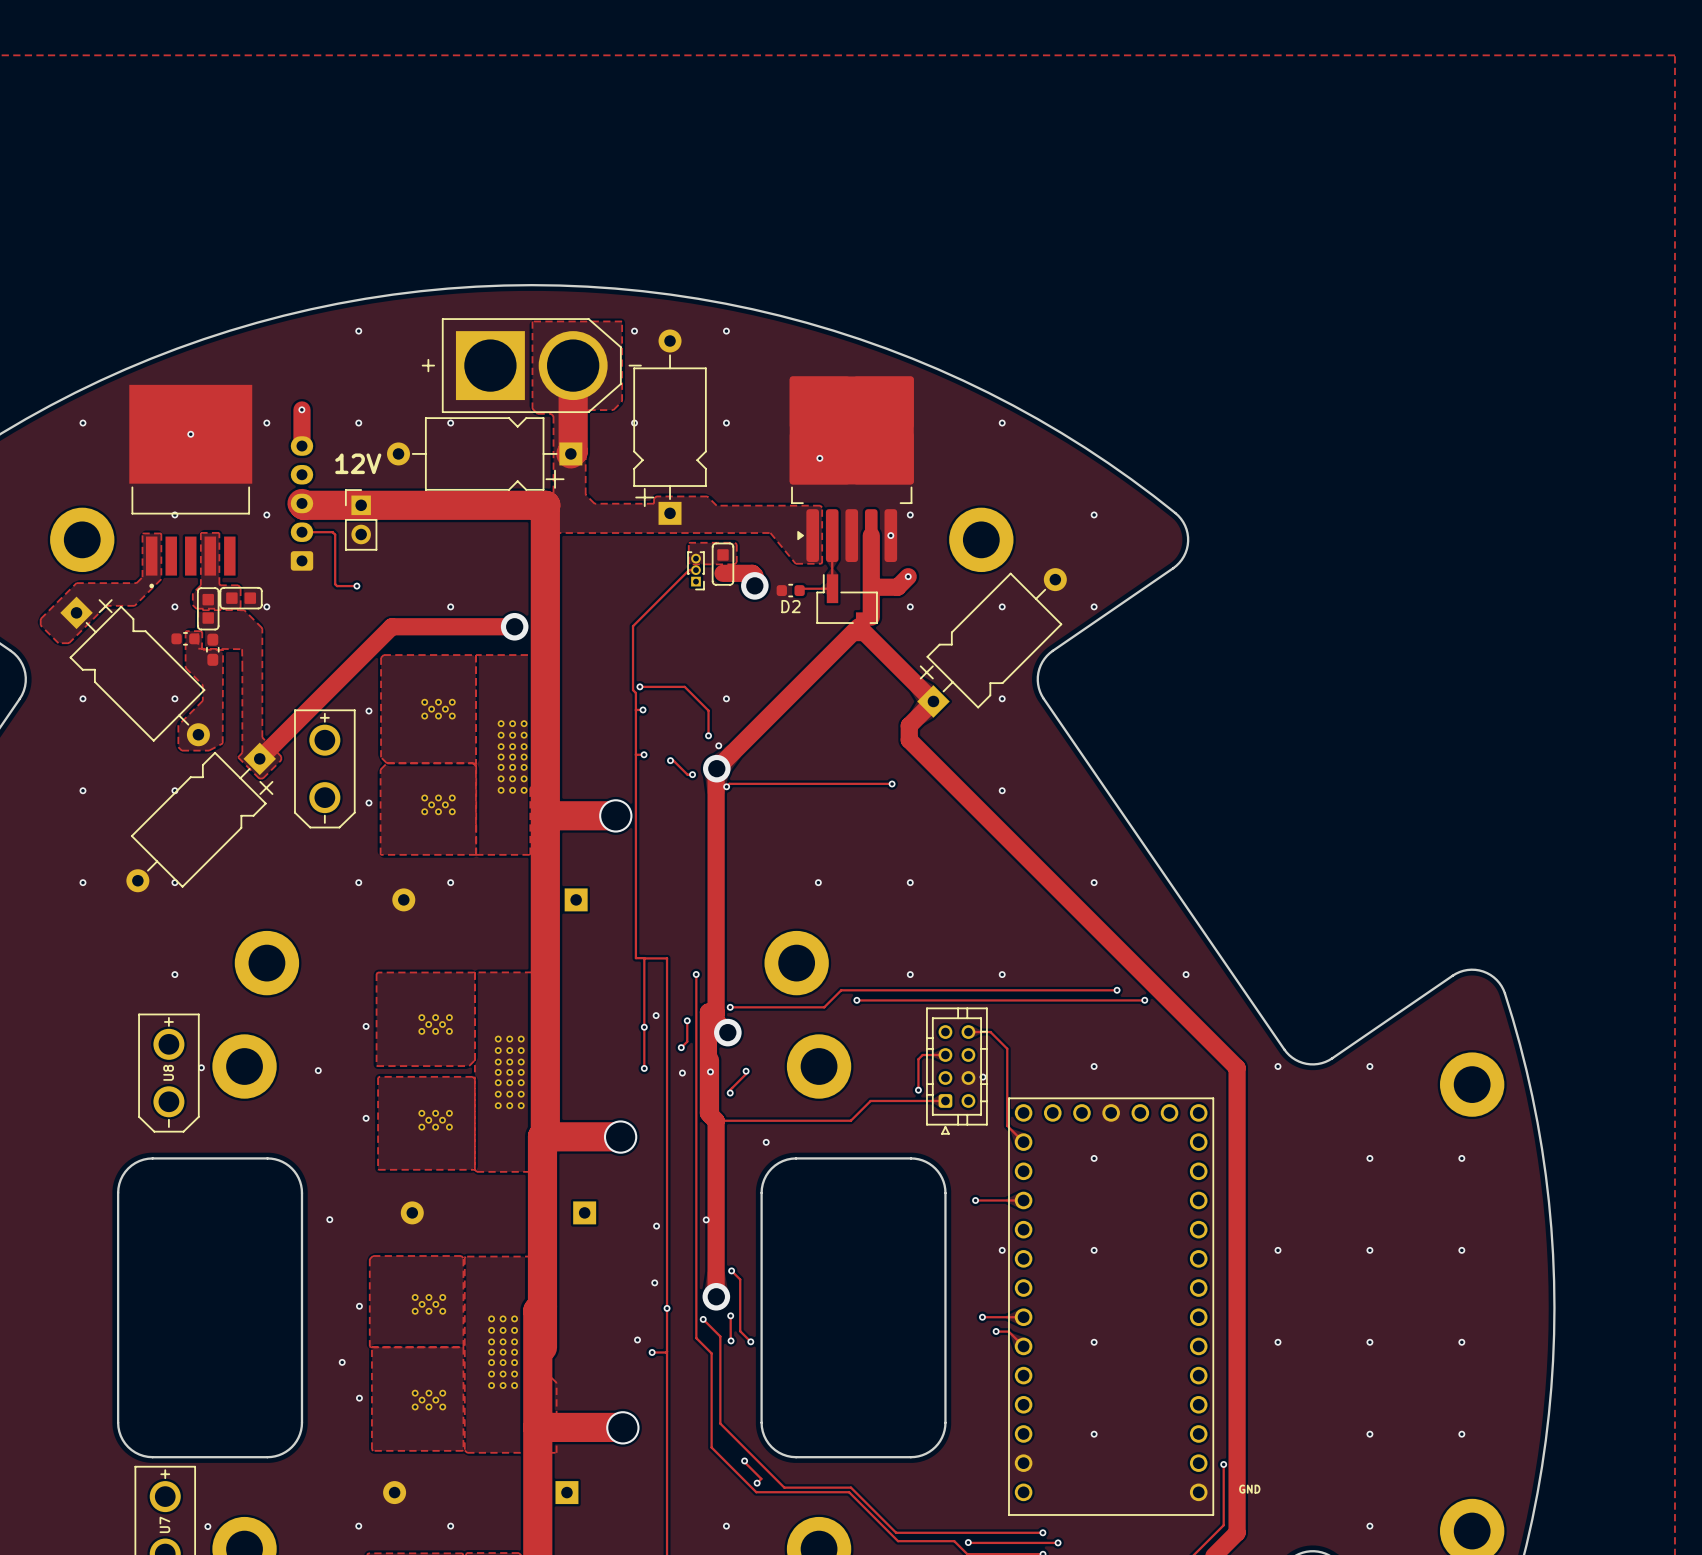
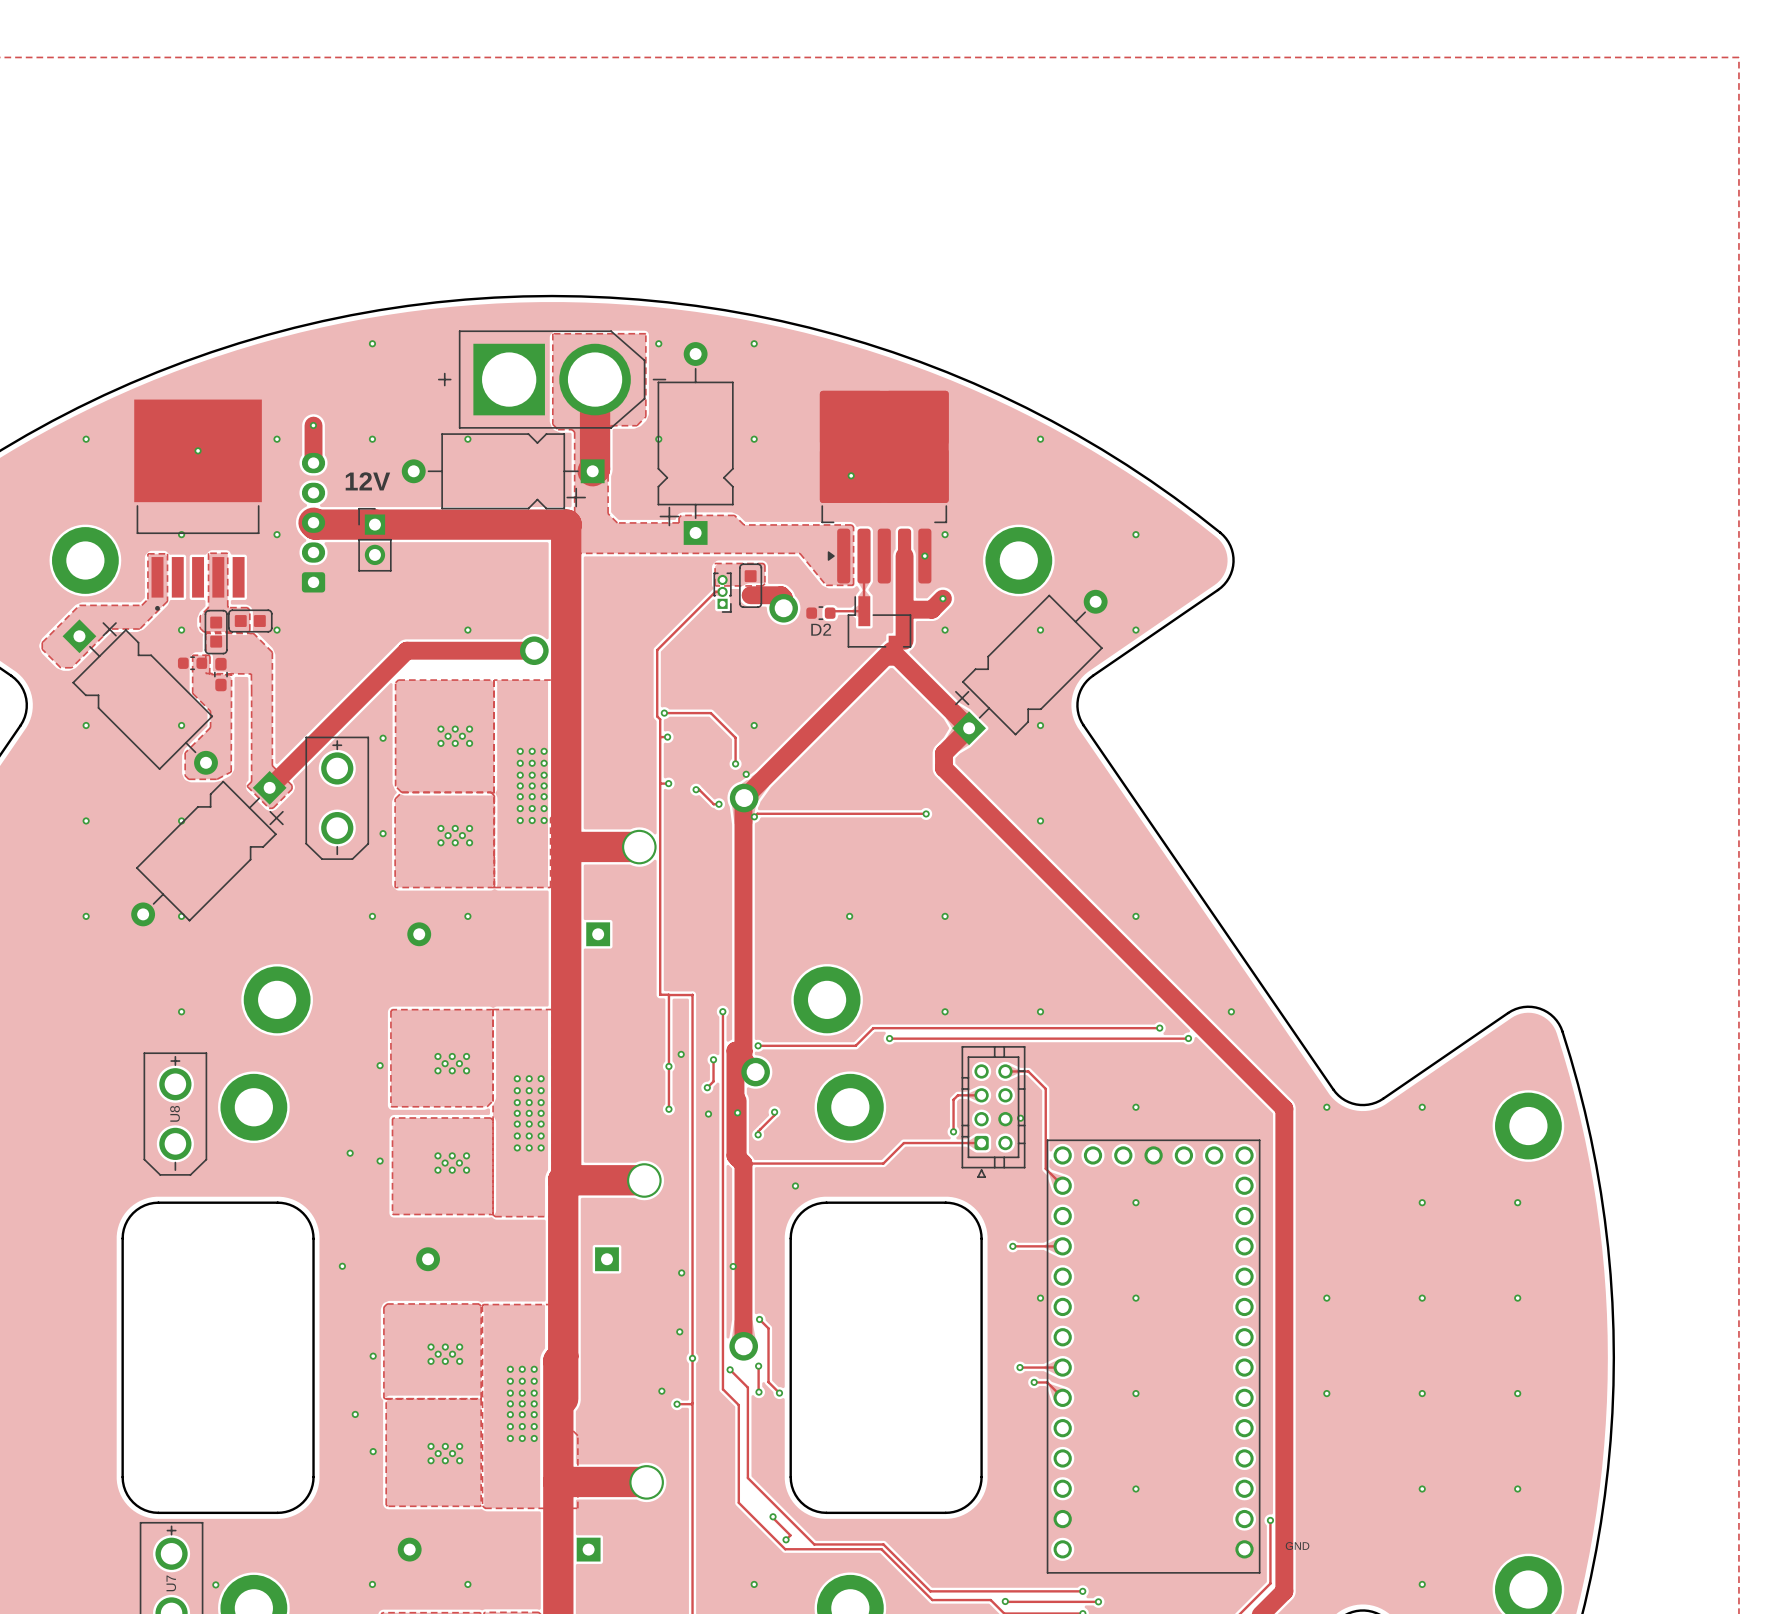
track: (301, 532) (332, 532) (335, 534) (335, 584) (337, 586) (356, 586) -> none
via: (356, 586) -> none
via: (201, 1067) -> none
via position: (318, 1070) -> (350, 1153)

